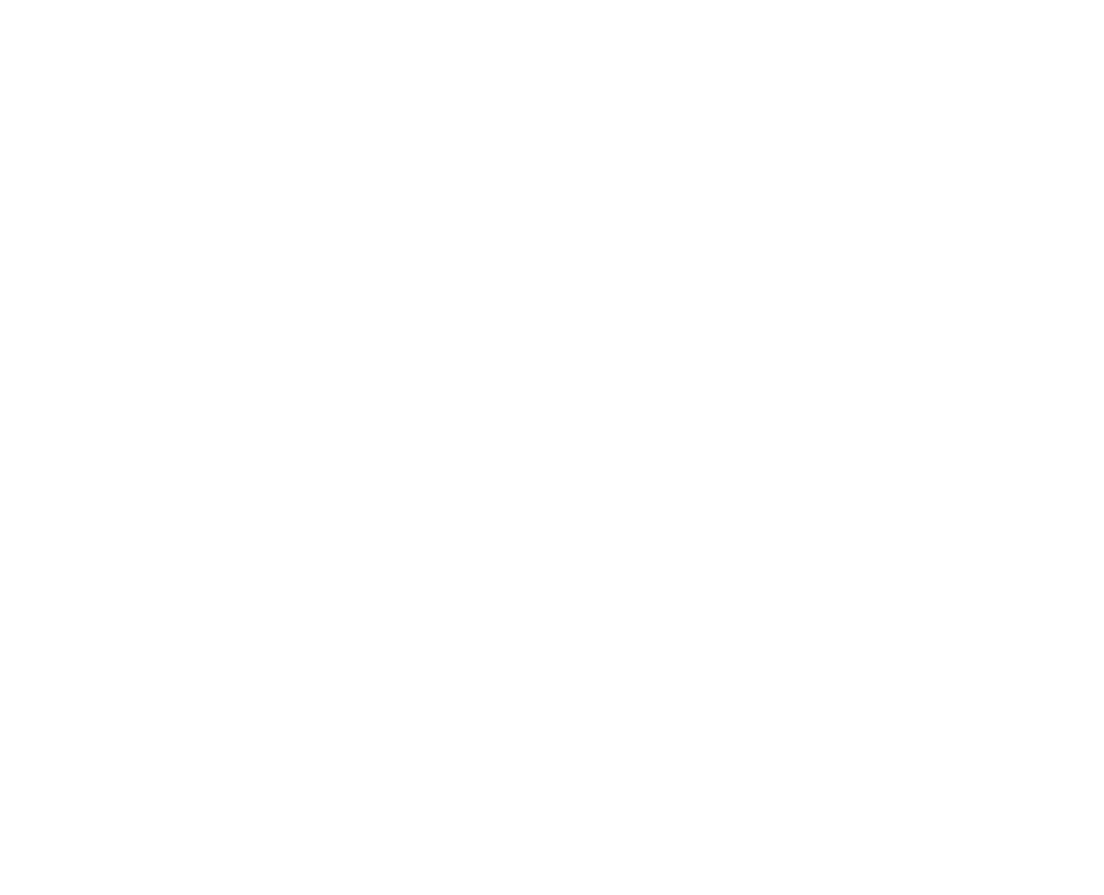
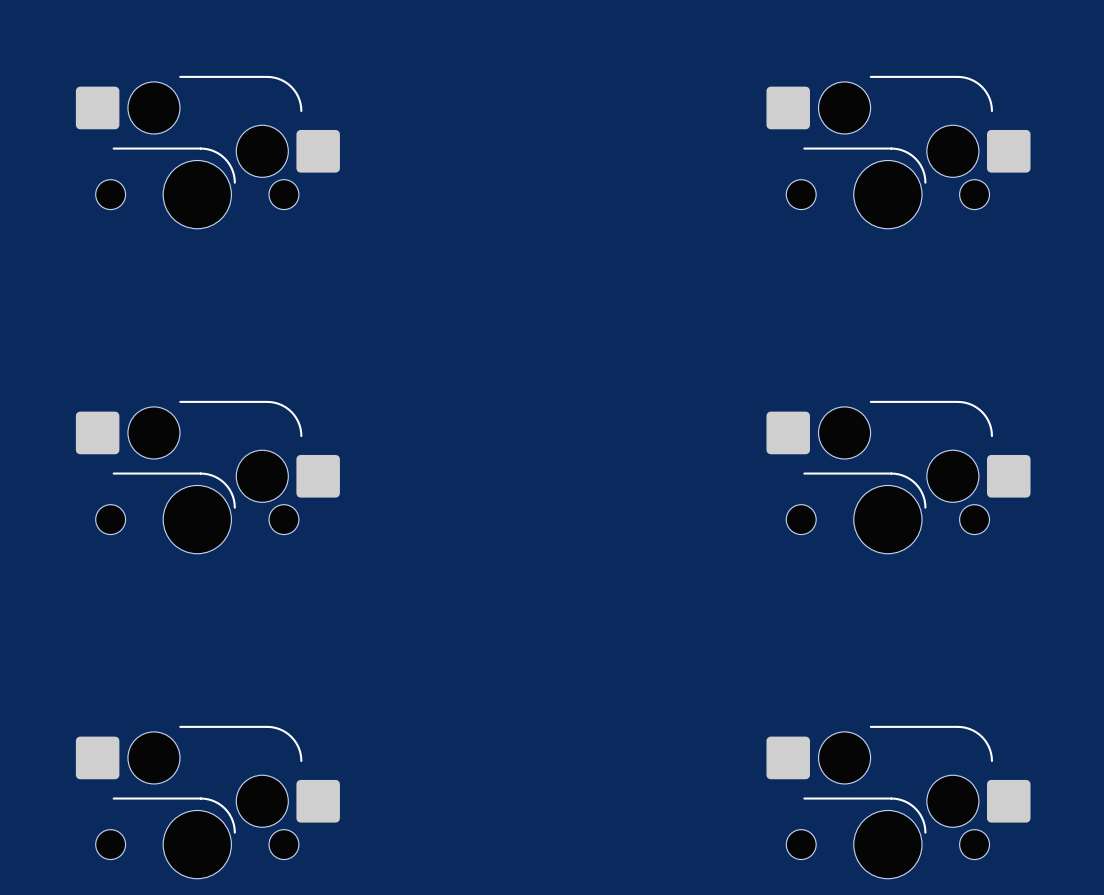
part: none -> (207, 152)
part: none -> (898, 152)
part: none -> (207, 477)
part: none -> (898, 477)
part: none -> (207, 802)
part: none -> (898, 802)

